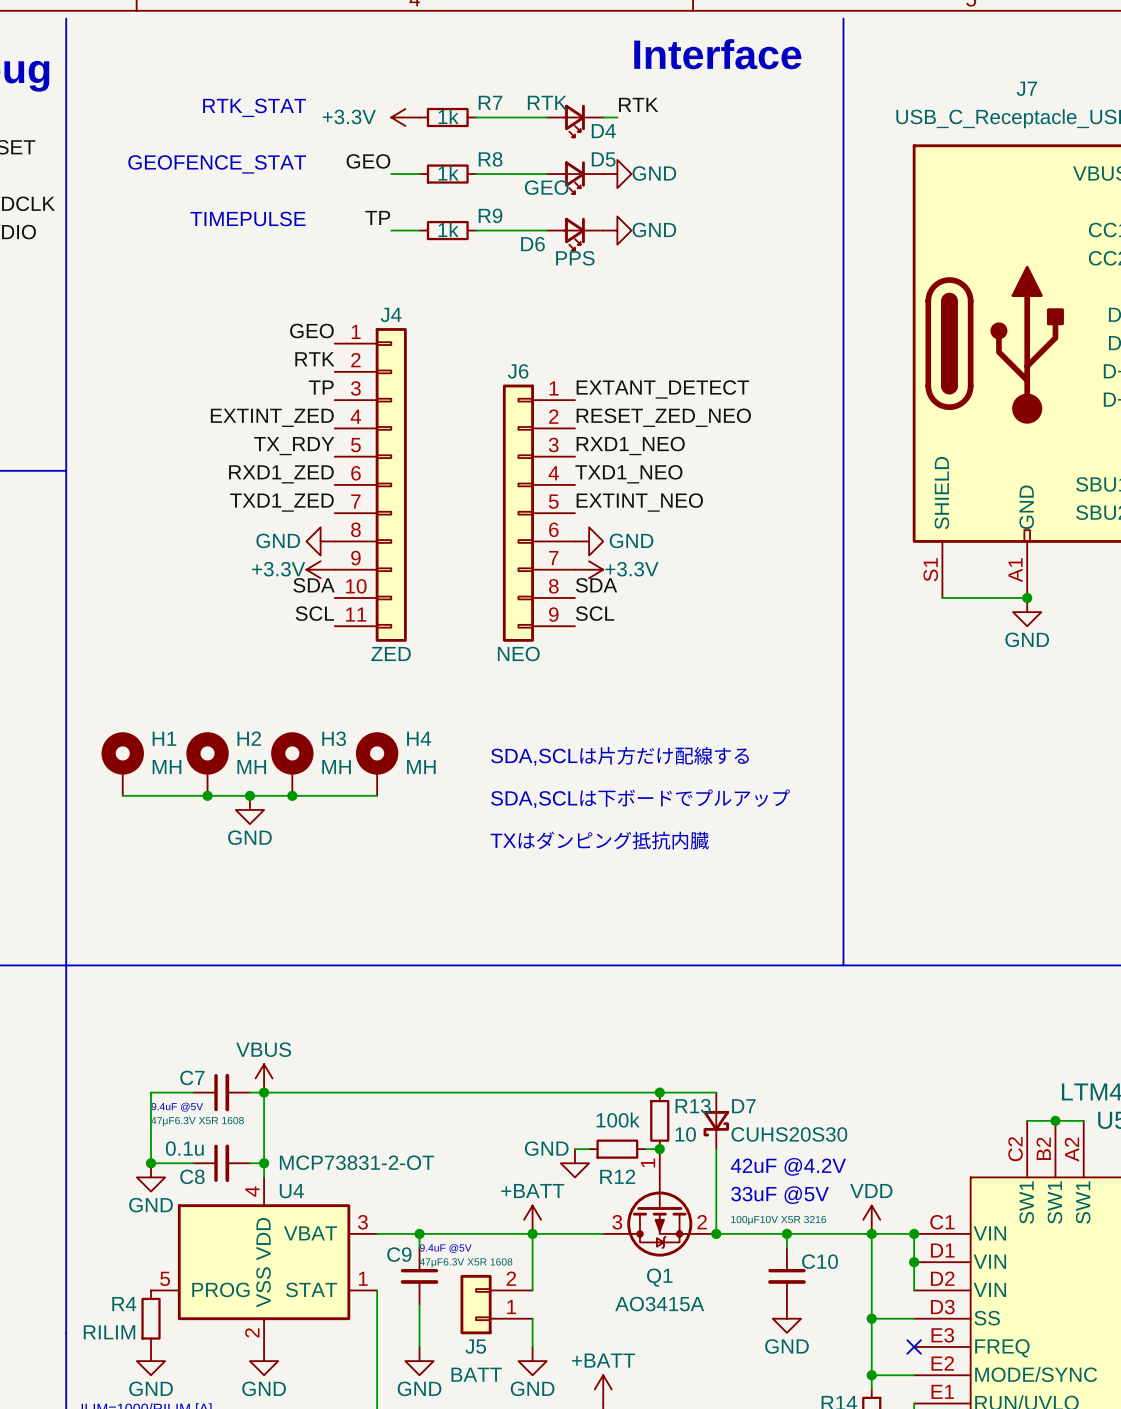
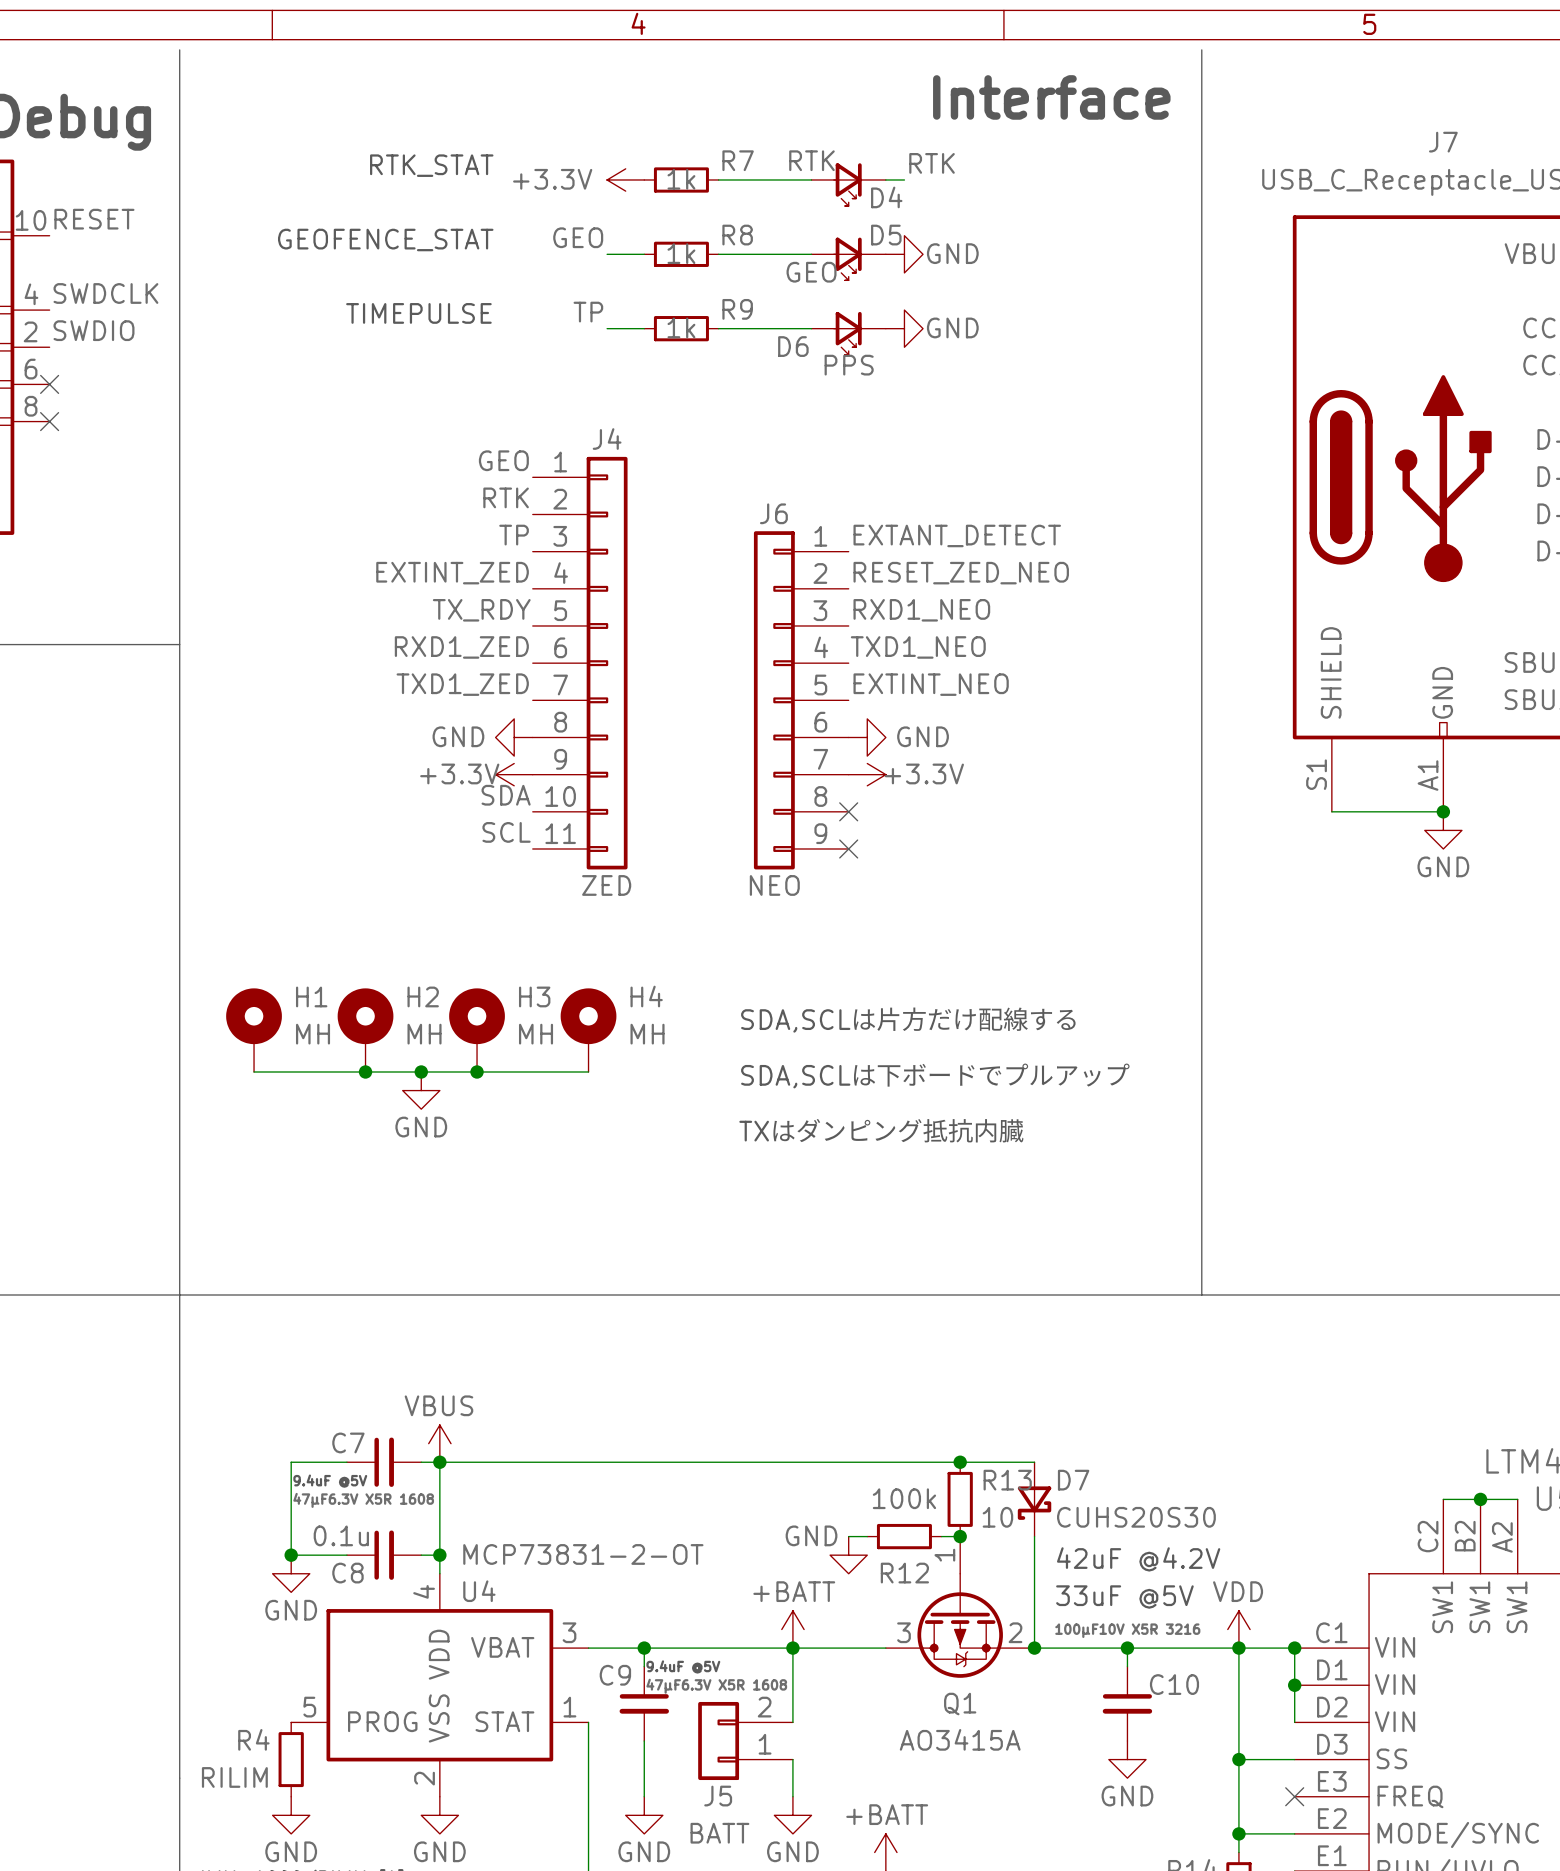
label: SDA (596, 585) -> none
no-connect mark: none -> (848, 811)
label: SCL (595, 613) -> none
no-connect mark: none -> (848, 848)

